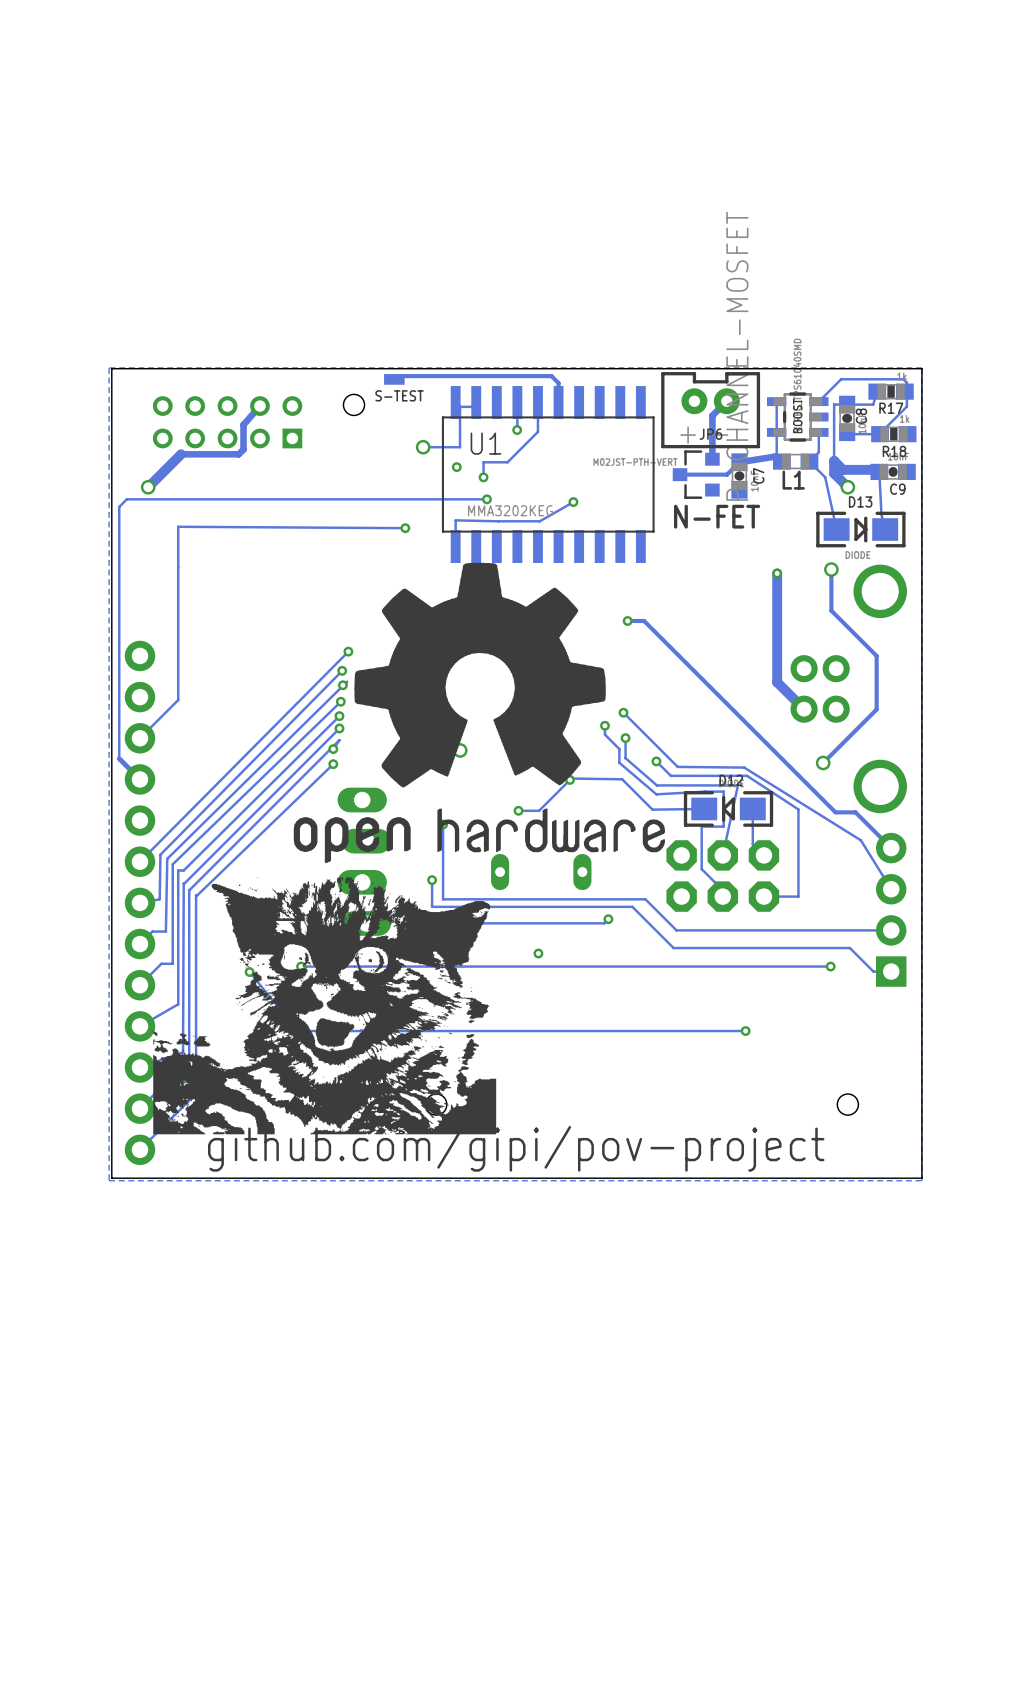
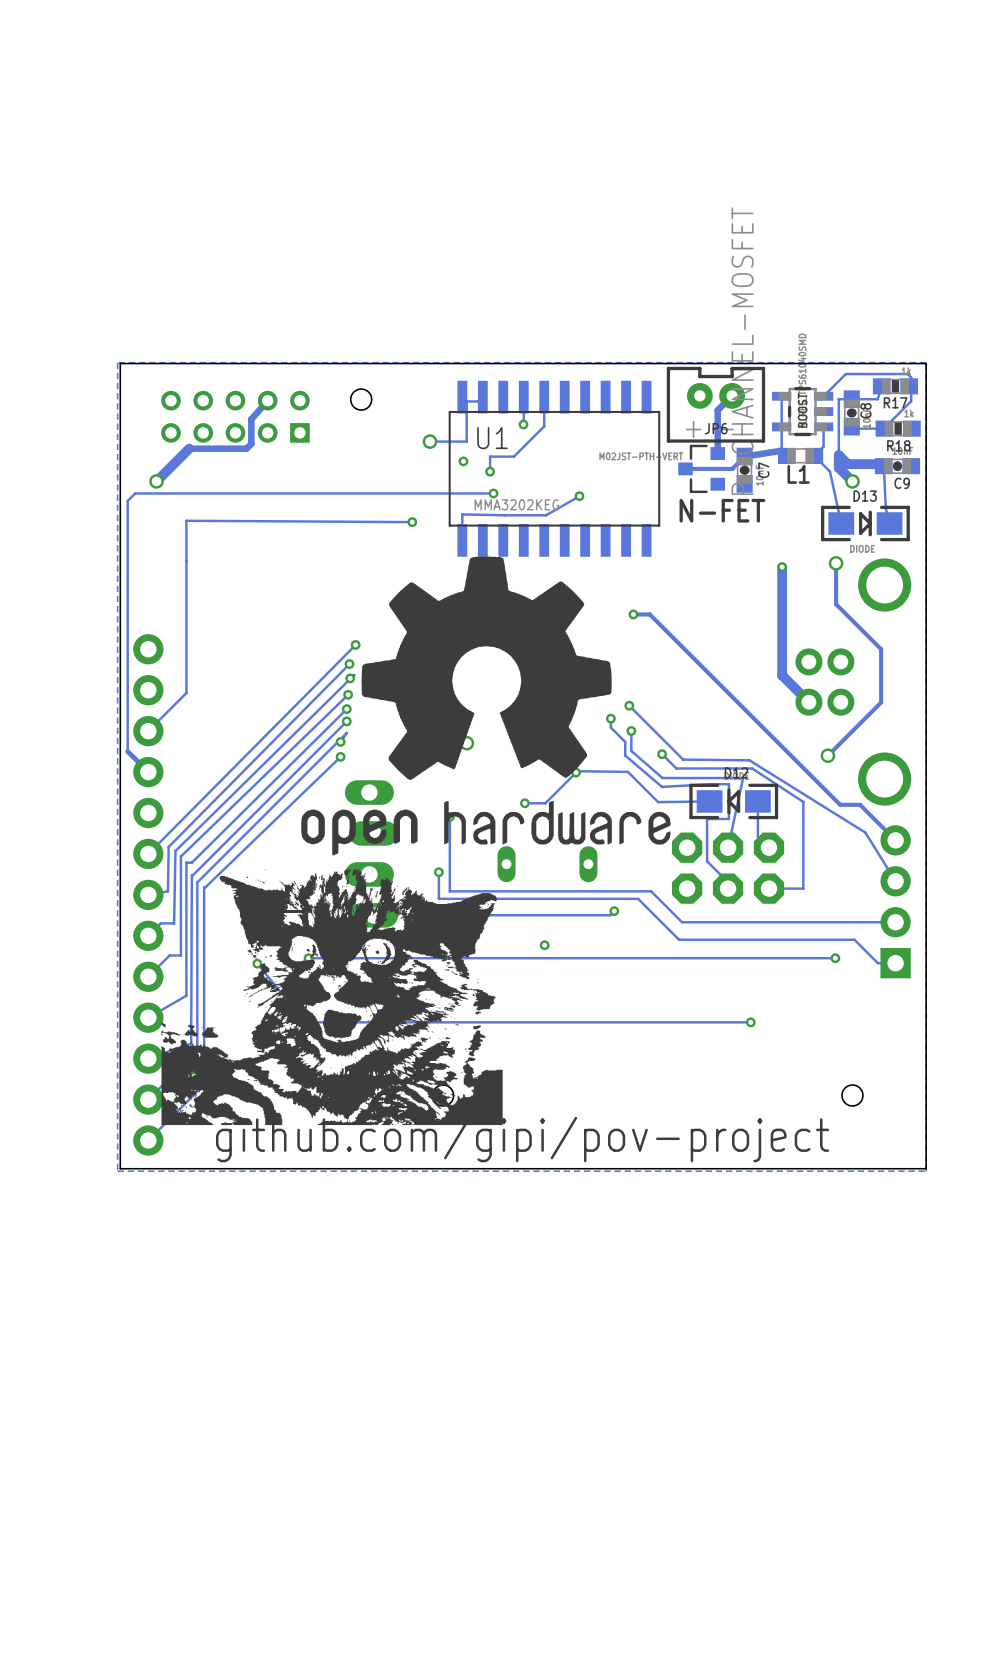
track: (394, 379) (403, 376) (551, 376) (558, 383) (558, 402) -> none
part: (394, 379) -> none
text: S-TEST (399, 395) -> none

